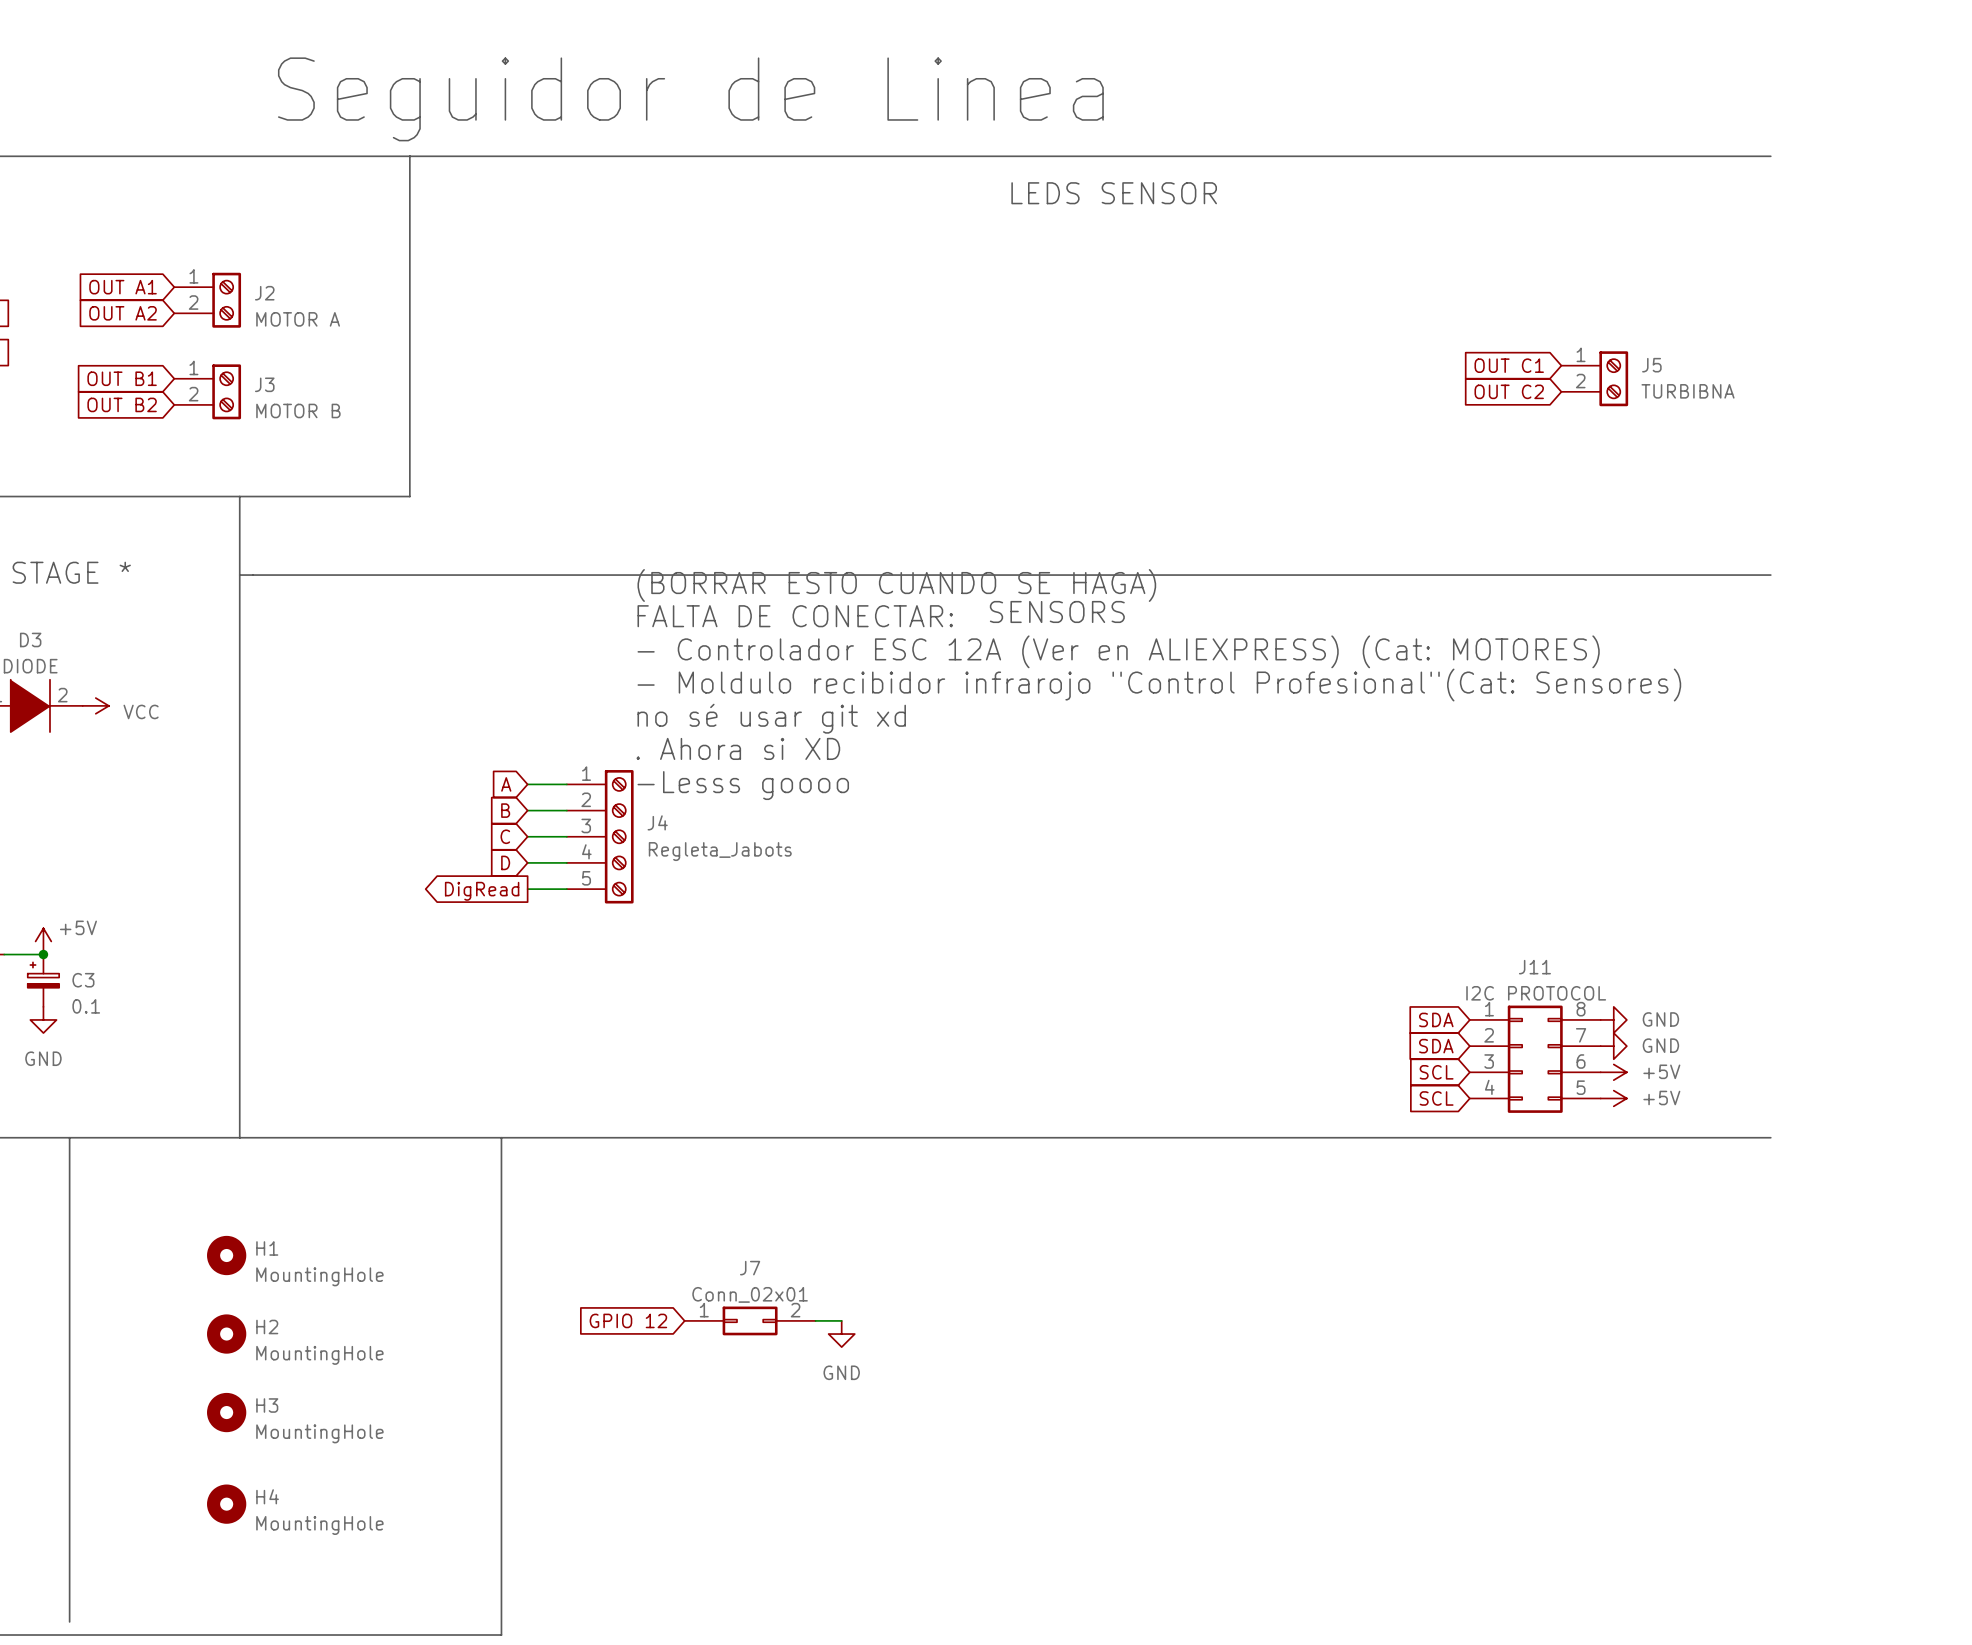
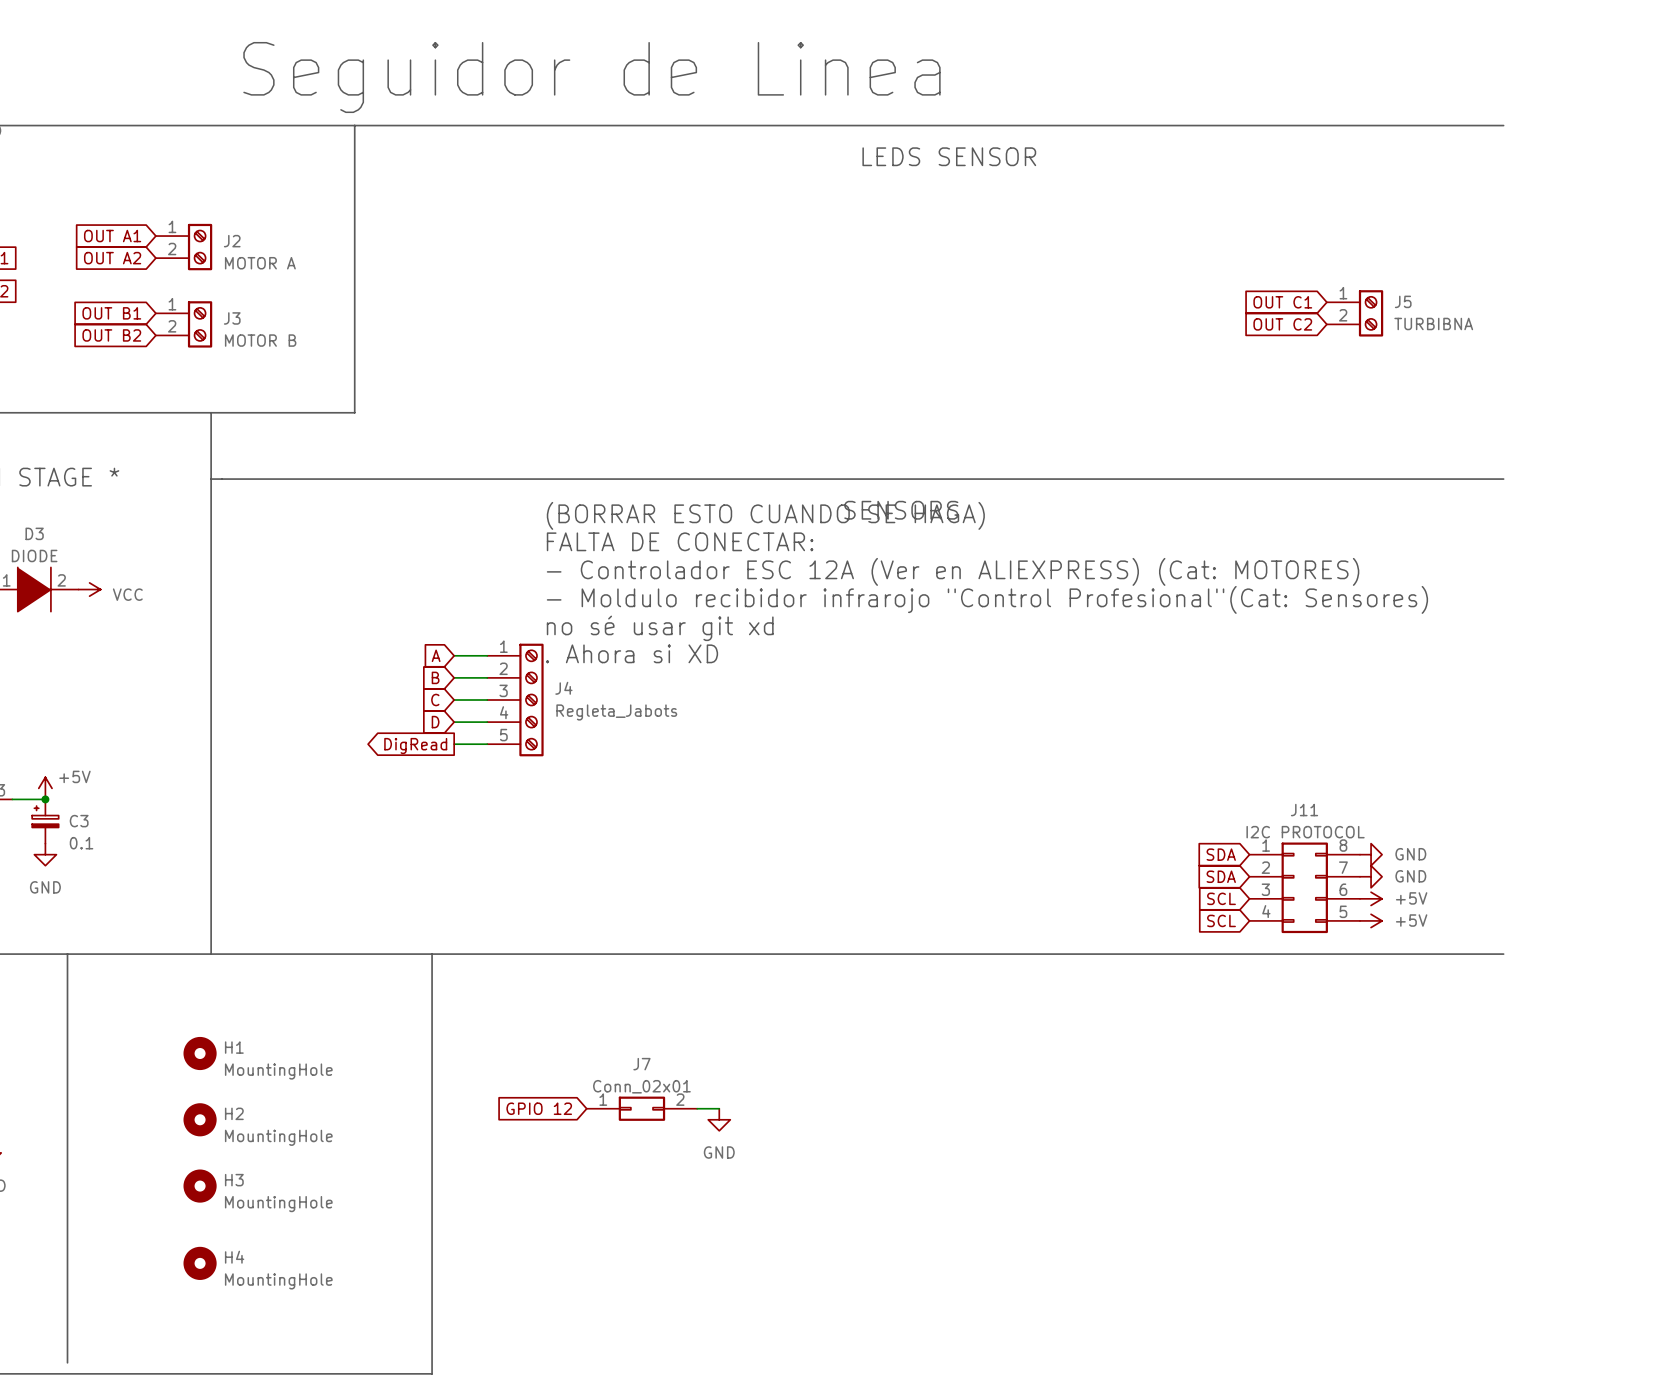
text: (BORRAR ESTO CUANDO SE HAGA) (896, 585) -> none
text: FALTA DE CONECTAR: (795, 616) -> (BORRAR ESTO CUANDO SE HAGA) (765, 515)
text: - Controlador ESC 12A (Ver en ALIEXPRESS) (Cat: MOTORES) (1118, 651) -> FALTA DE CONECTAR: (680, 541)
text: - Moldulo recibidor infrarojo "Control Profesional"(Cat: Sensores) (1159, 685) -> - Controlador ESC 12A (Ver en ALIEXPRESS) (Cat: MOTORES) (953, 571)
text: no sé usar git xd (771, 718) -> - Moldulo recibidor infrarojo "Control Profesional"(Cat: Sensores) (987, 599)
text: . Ahora si XD (738, 748) -> no sé usar git xd (660, 628)
text: -Lesss goooo (743, 785) -> . Ahora si XD (632, 653)

